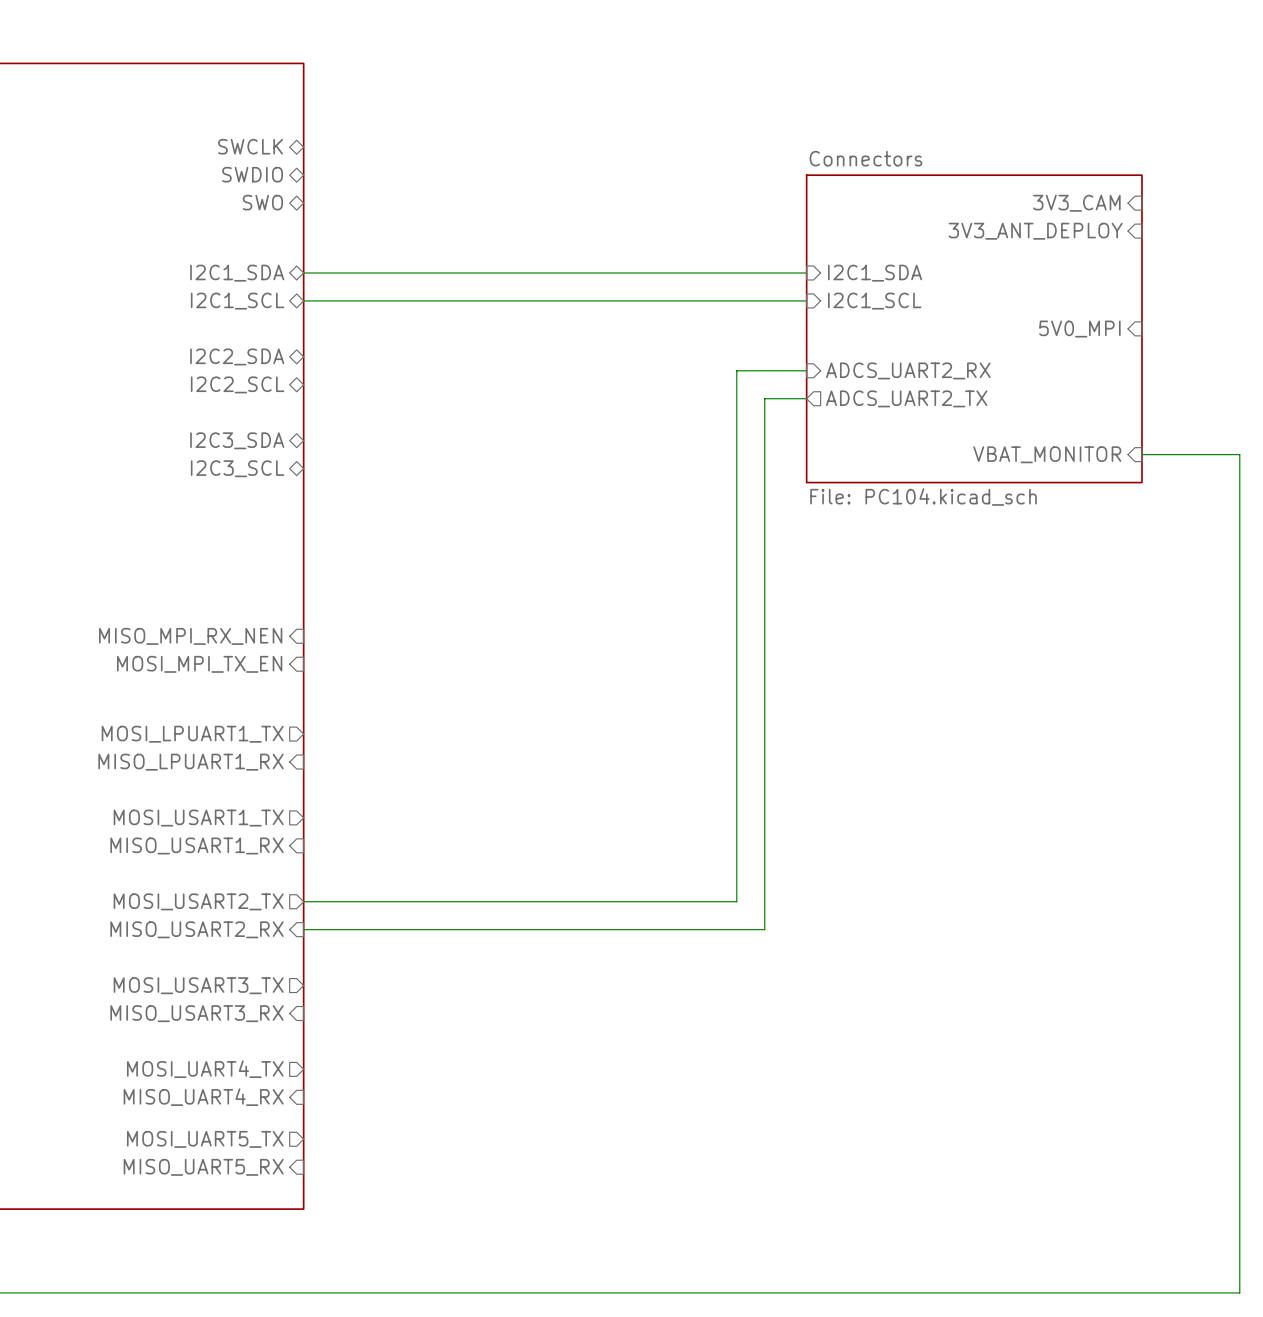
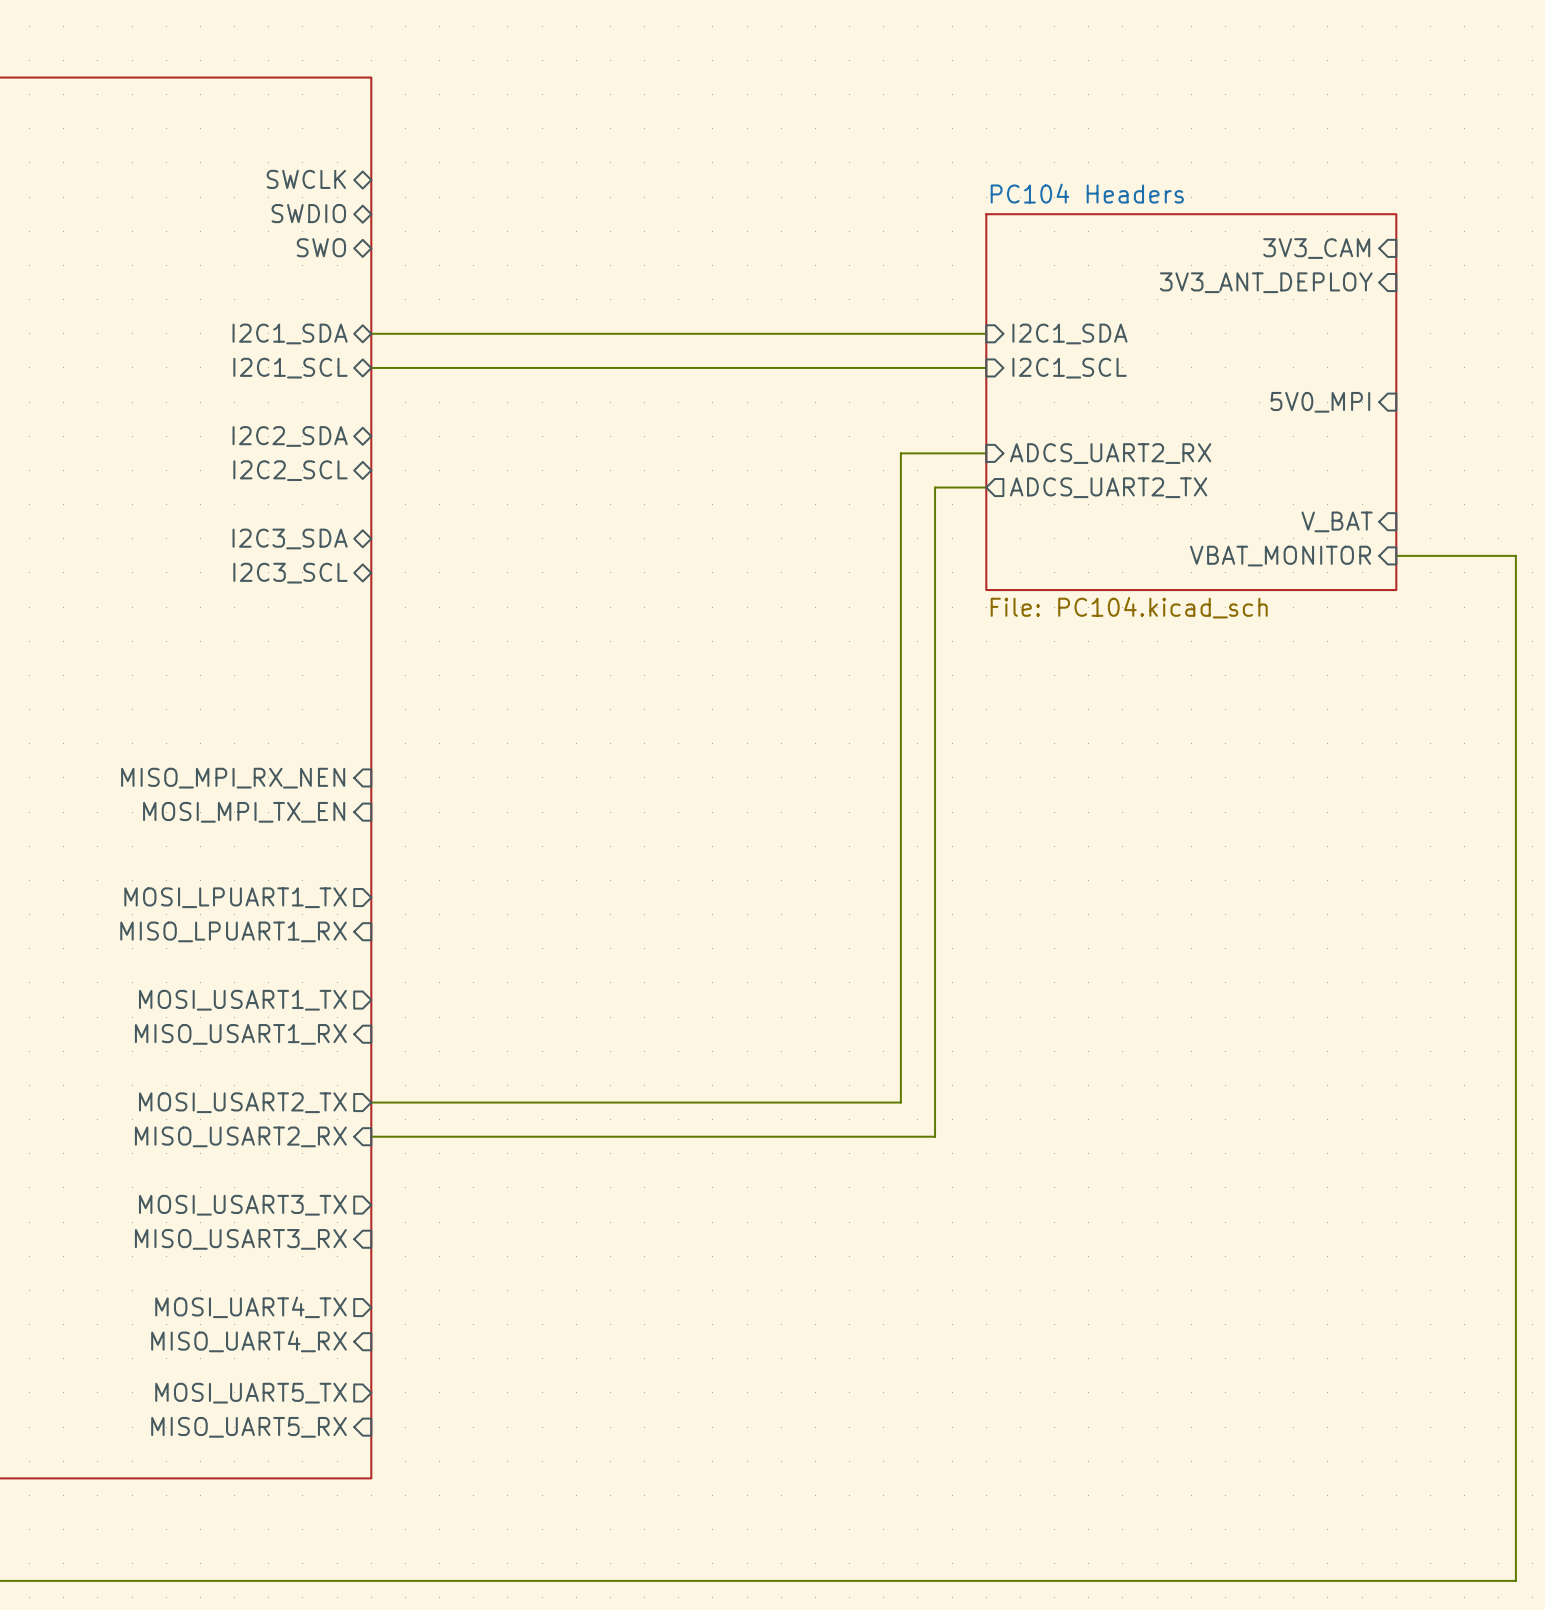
sheet Connectors name: Connectors (865, 158) -> PC104 Headers (1087, 193)
sheet pin: none -> V_BAT (1337, 521)

